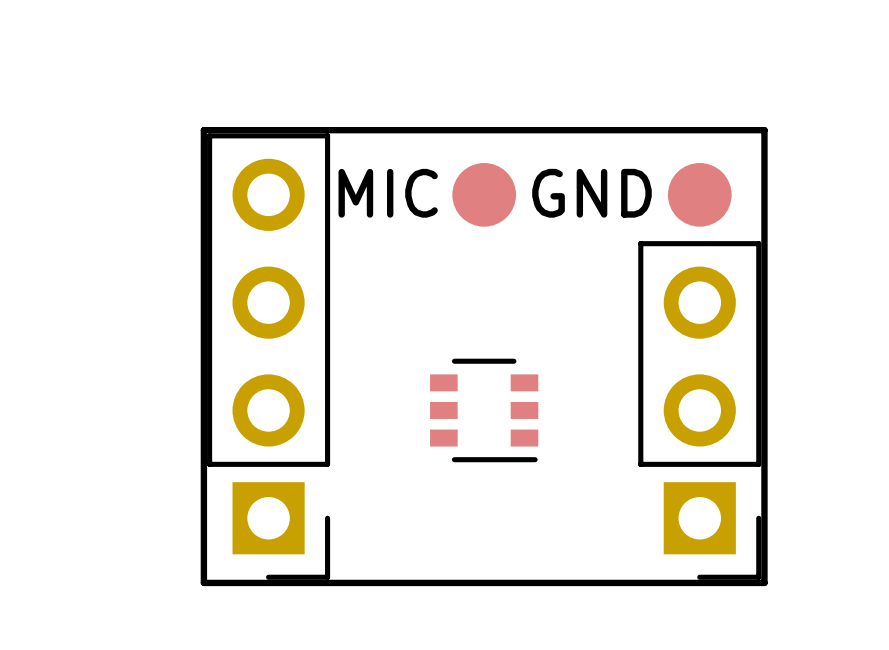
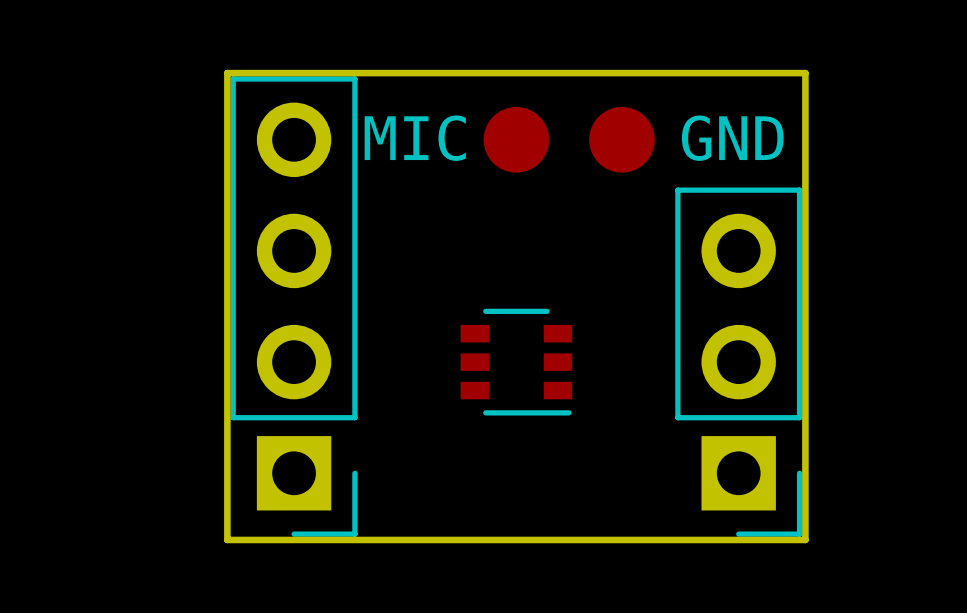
part value position: GND (591, 193) -> GND (732, 138)
part position: (699, 194) -> (621, 139)

